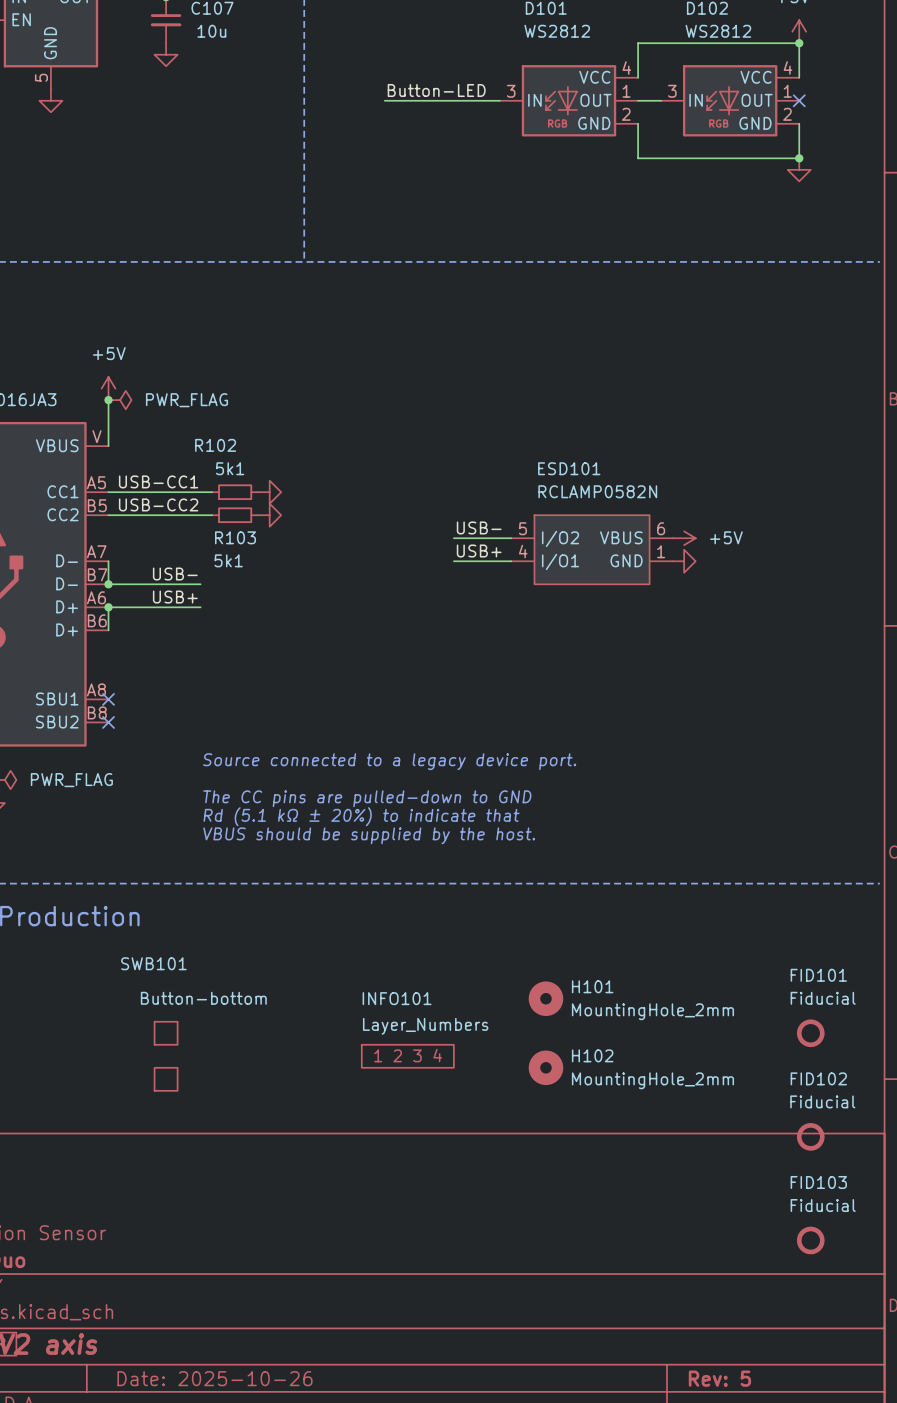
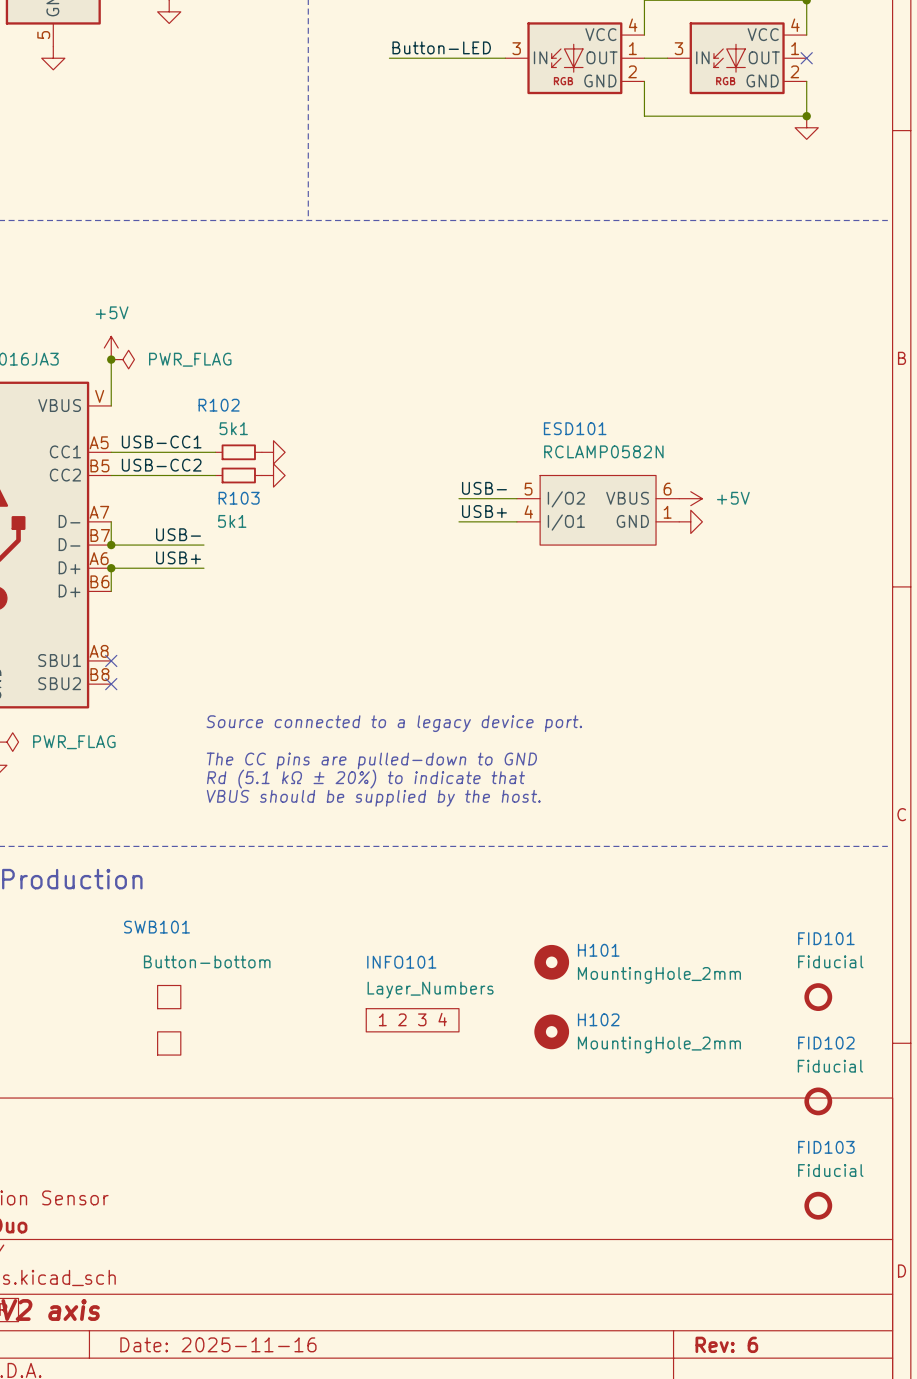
title block: Date: 2025-10-26 (214, 1378) -> Date: 2025-11-16 (218, 1344)
title block: Rev: 5 (719, 1378) -> Rev: 6 (726, 1344)

